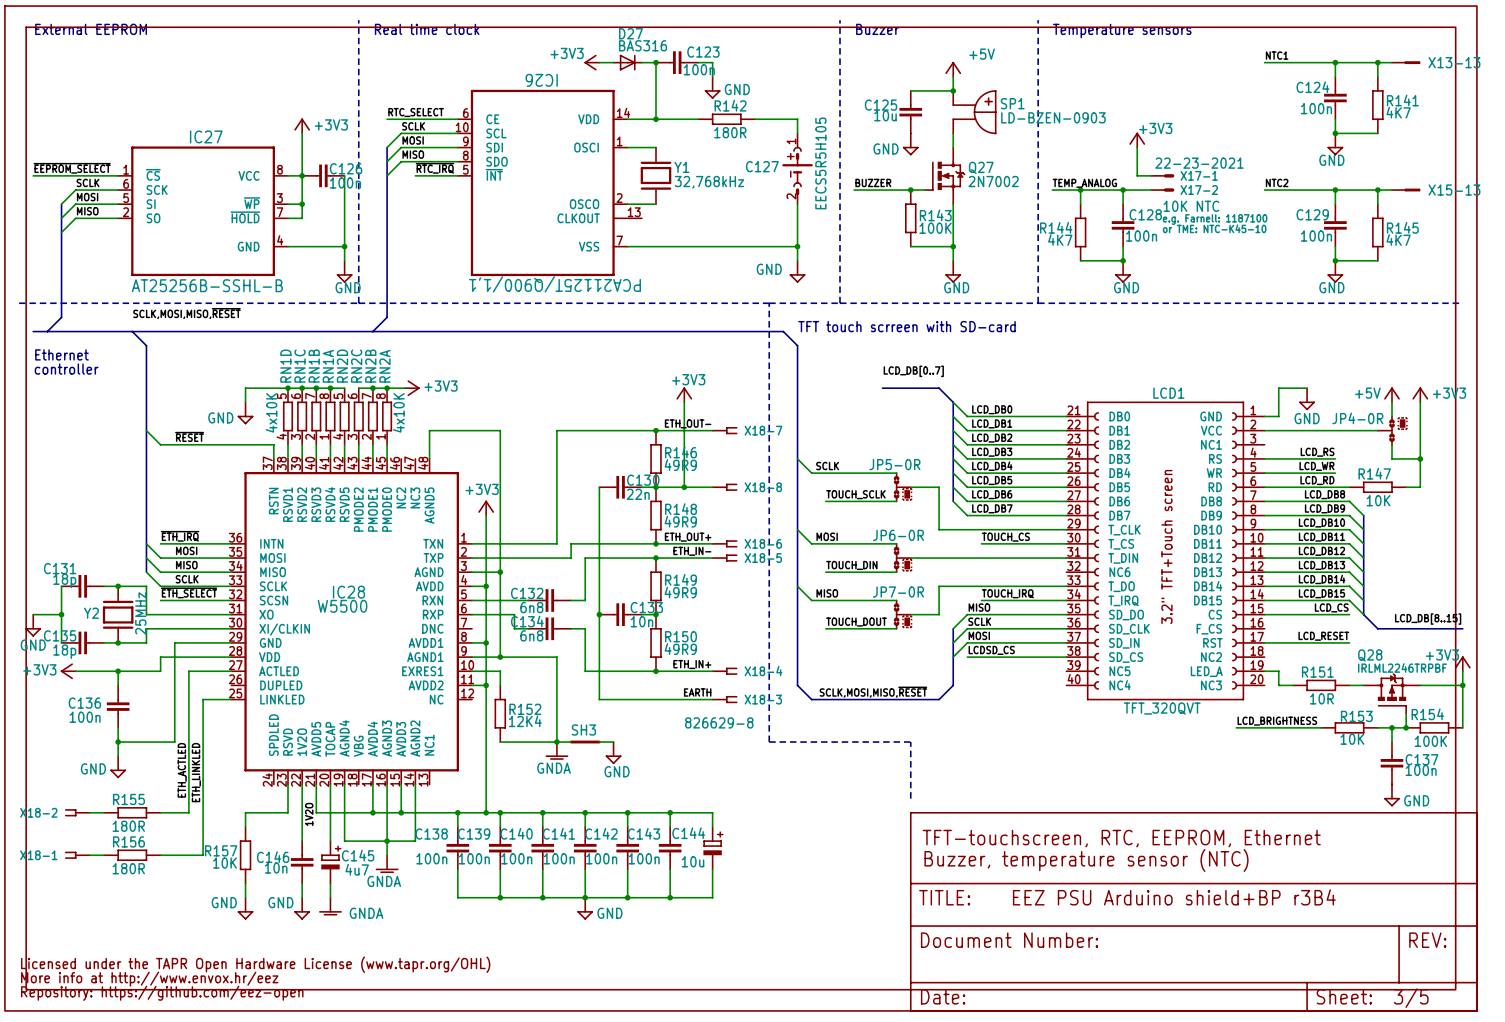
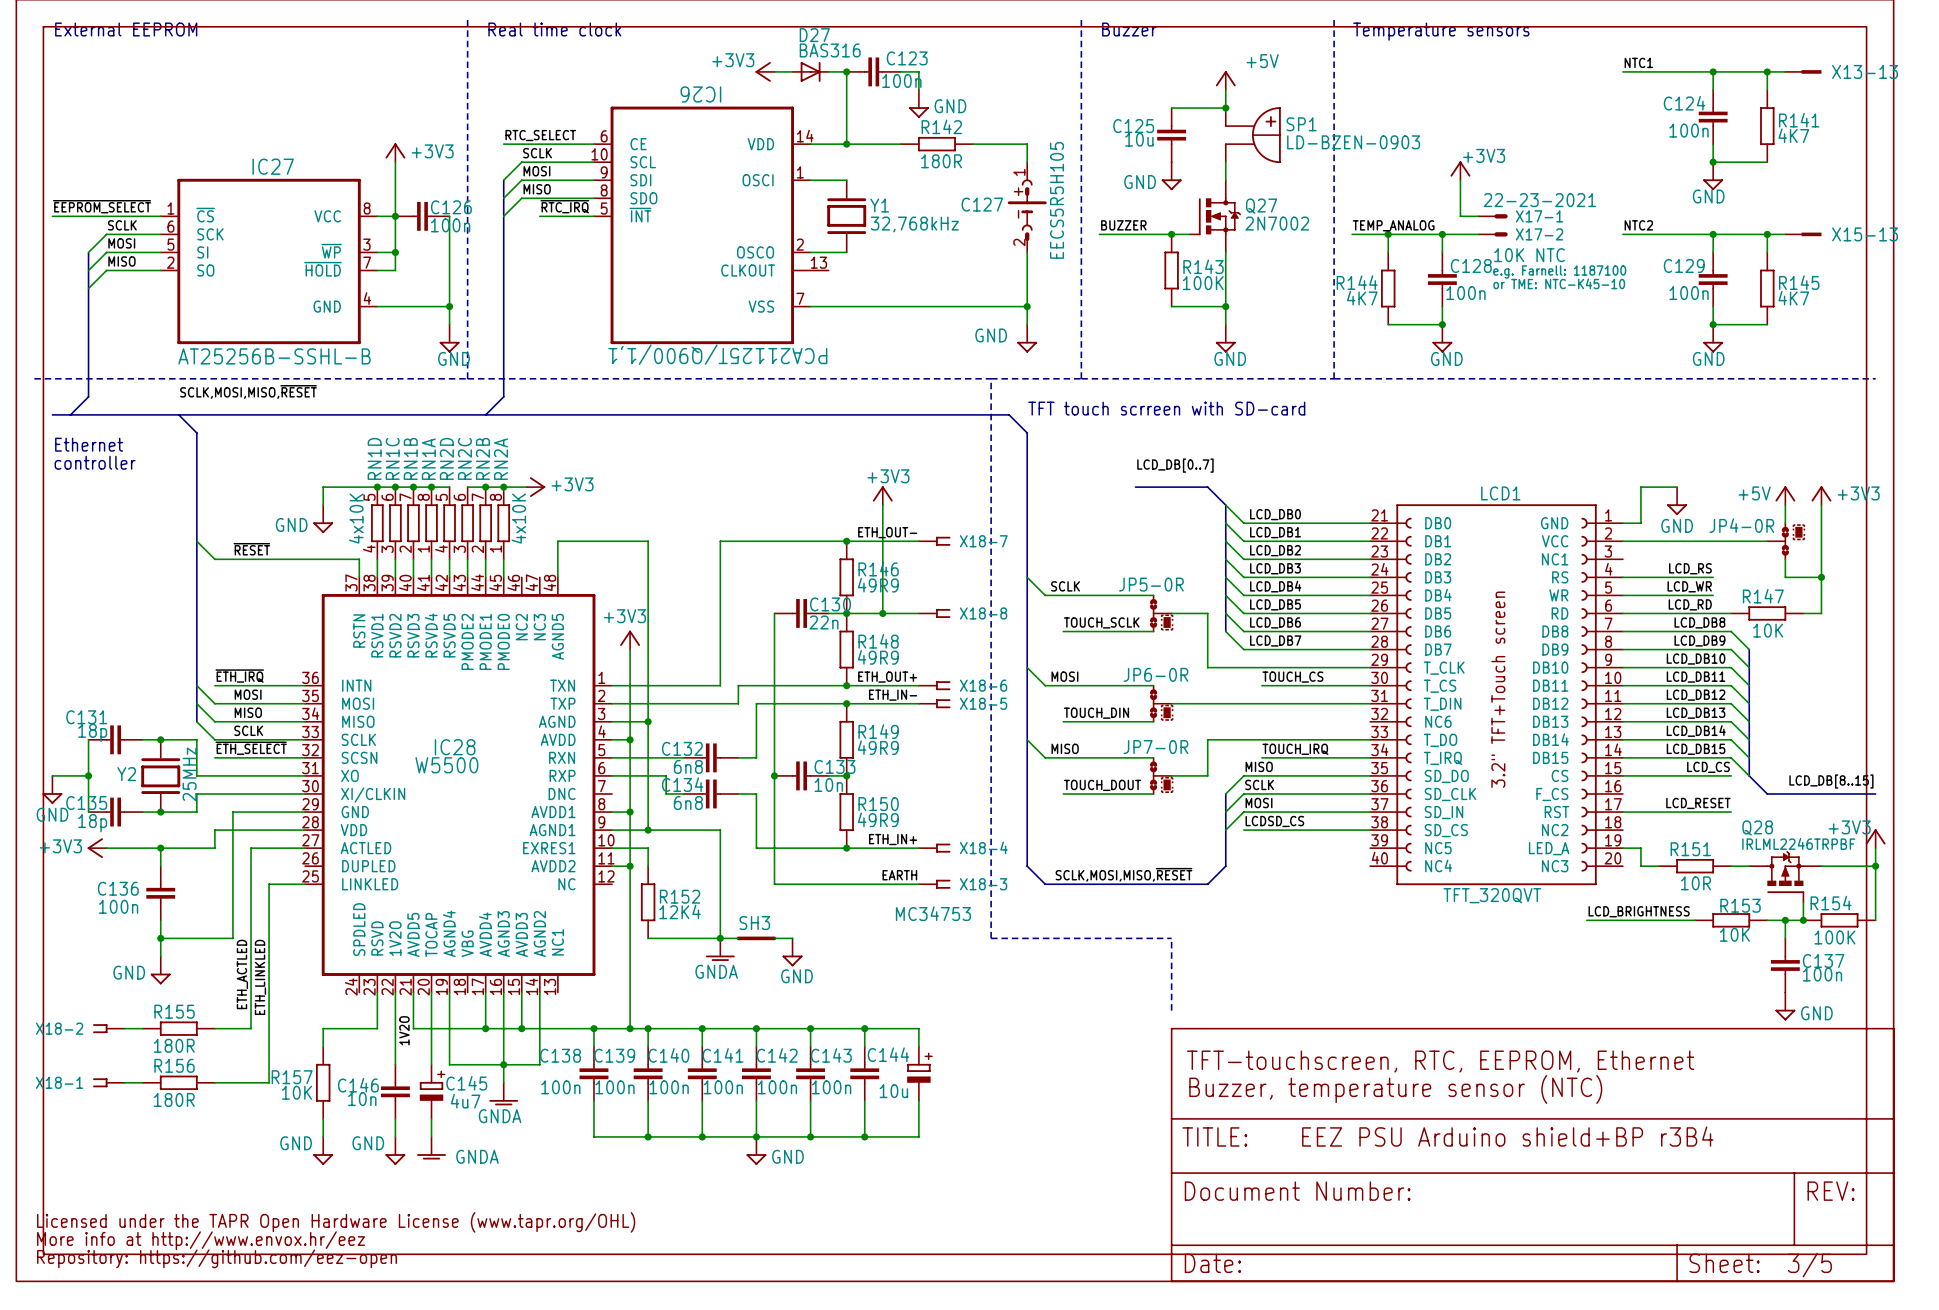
X18-1 value: 826629-8 (719, 722) -> MC34753 (933, 913)

